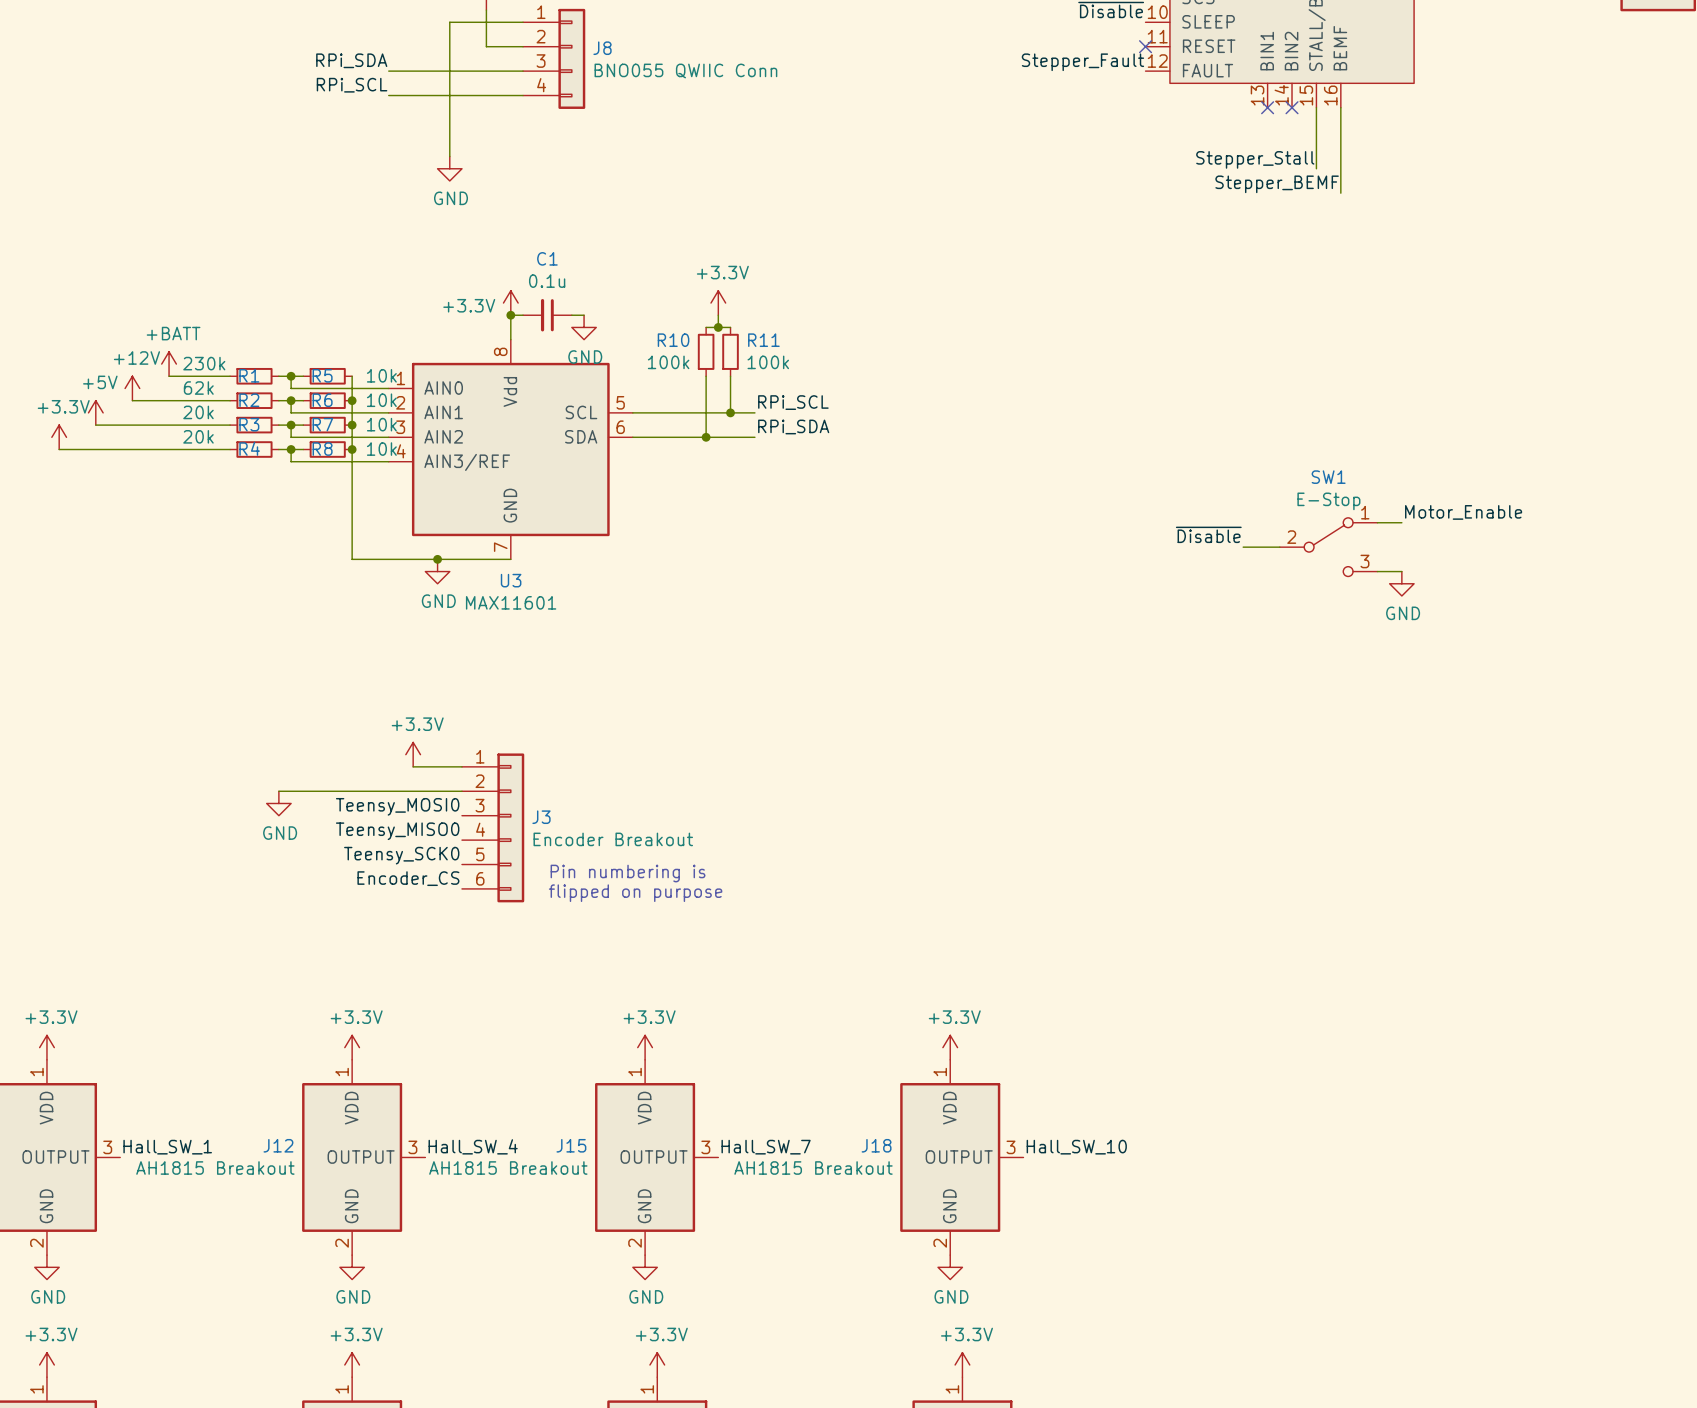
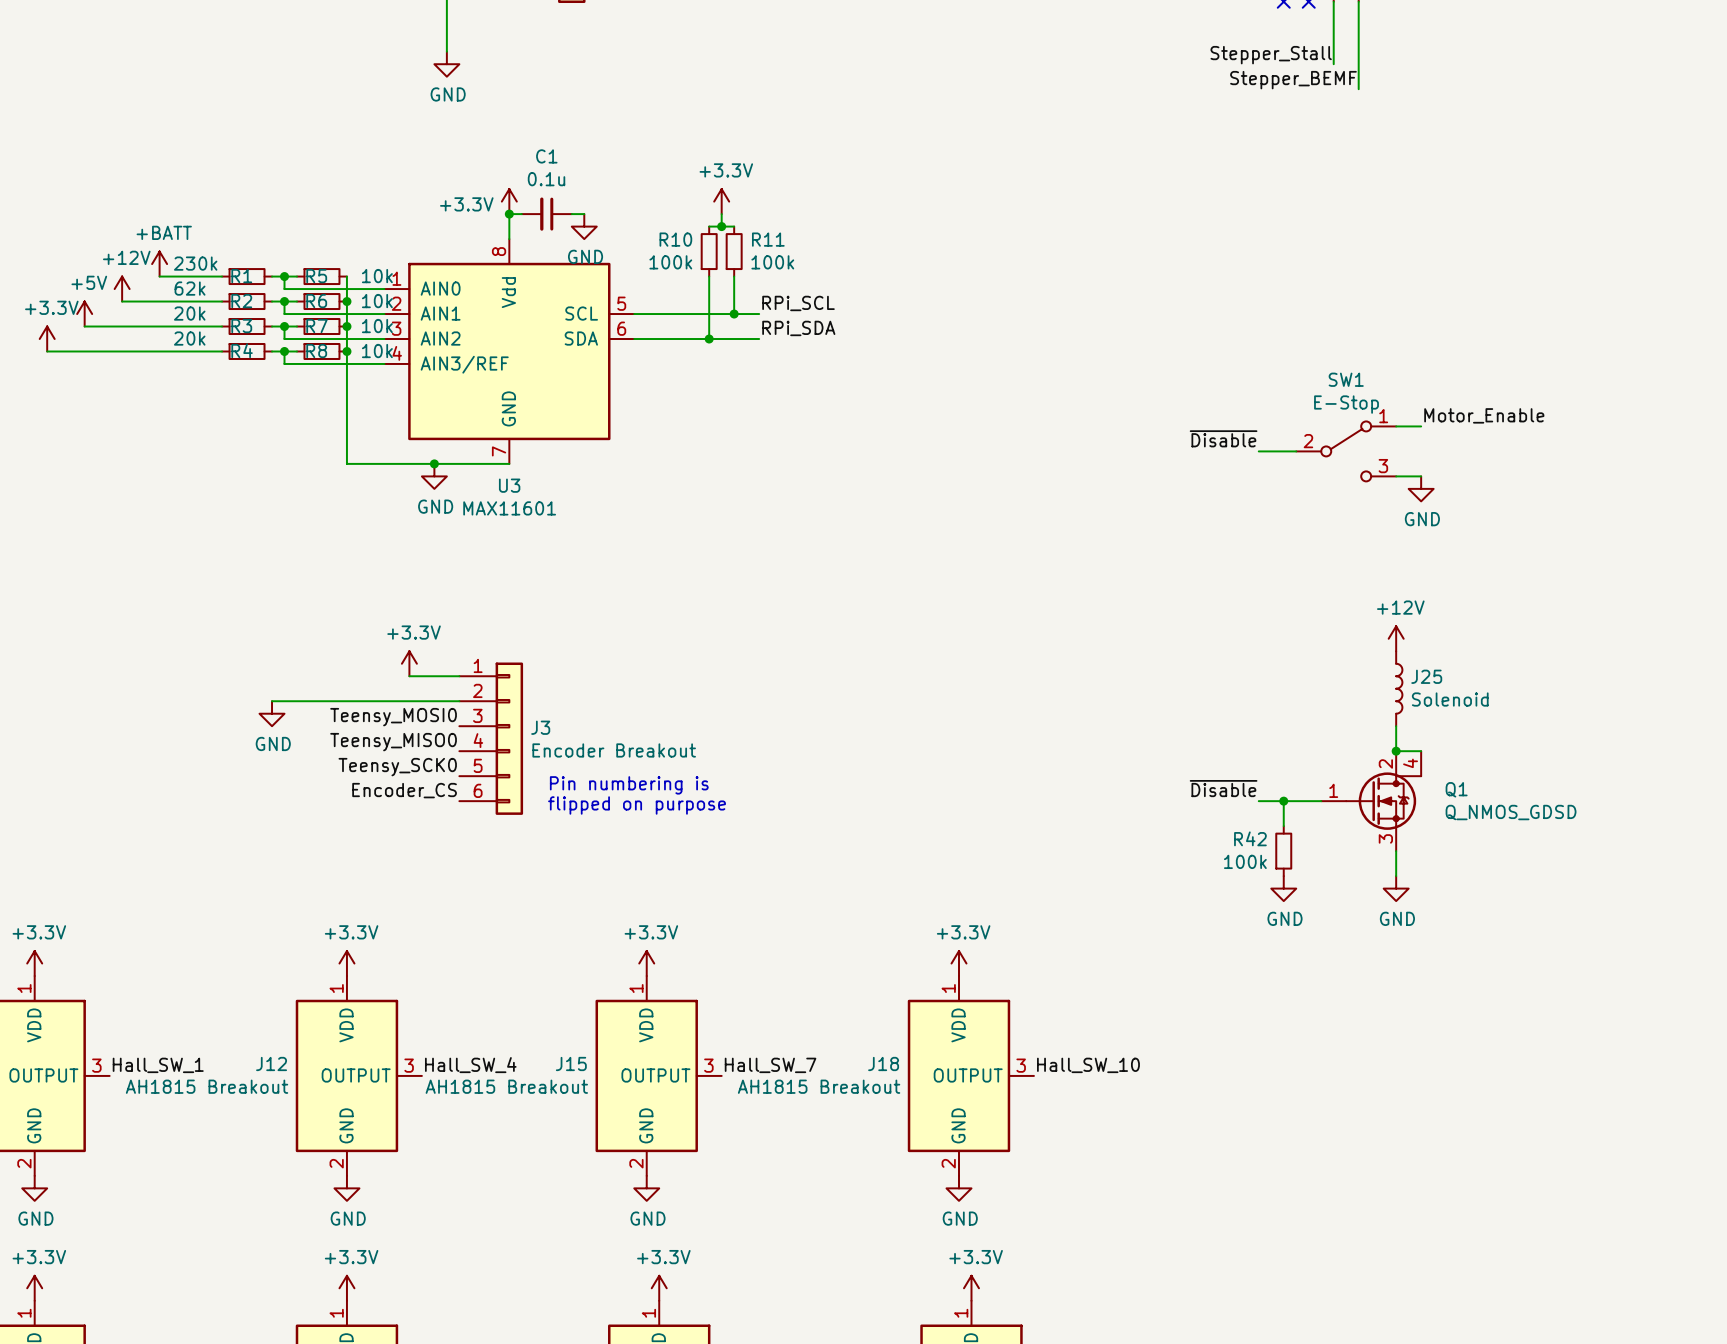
power symbol: none -> +12V (1396, 638)
J25: none -> Solenoid (1399, 688)
wire: none -> (1396, 726) (1396, 751) (1421, 751)
junction: none -> (1396, 751)
label: none -> ~{Disable} (1223, 788)
wire: none -> (1258, 801) (1321, 801)
wire: none -> (1283, 801) (1283, 826)
junction: none -> (1283, 801)
Q1: none -> Q_NMOS_GDSD (1371, 801)
R42: none -> 100k (1283, 851)
wire: none -> (1396, 851) (1396, 876)
power symbol: none -> GND (1283, 888)
power symbol: none -> GND (1396, 888)

